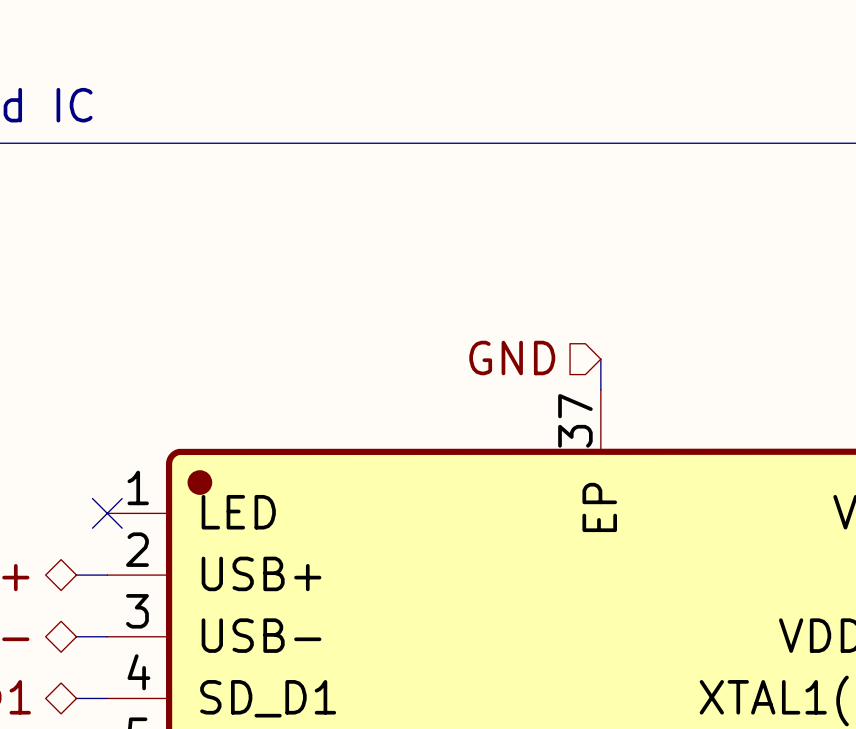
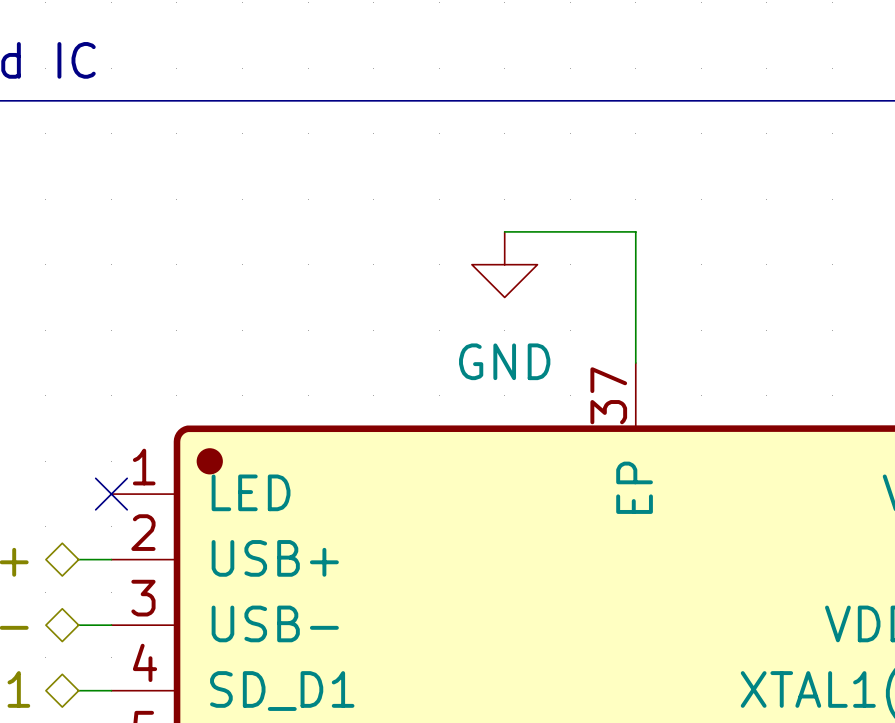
wire: none -> (504, 231) (635, 231) (635, 330)
power symbol: none -> GND (504, 264)
hierarchical label: GND (512, 358) -> none

